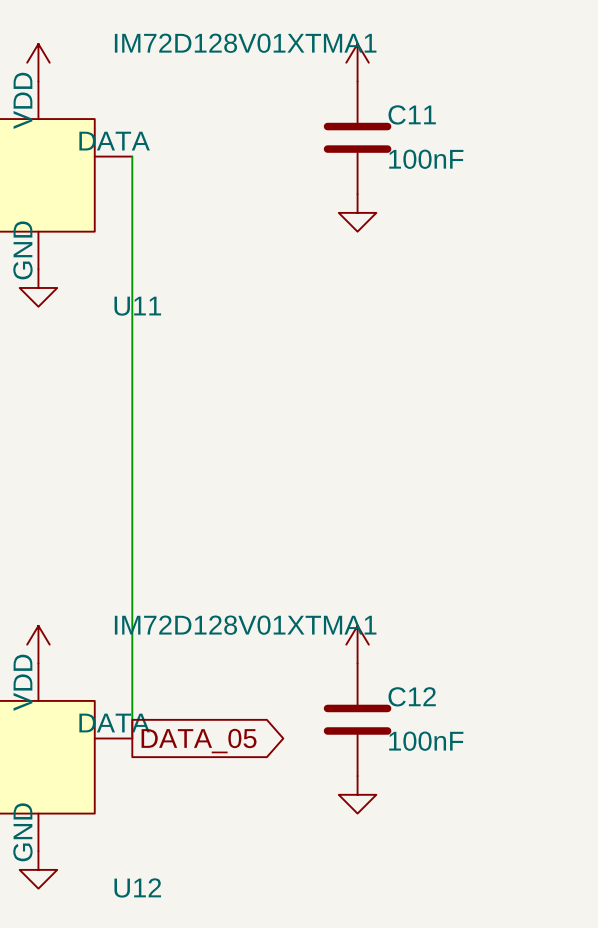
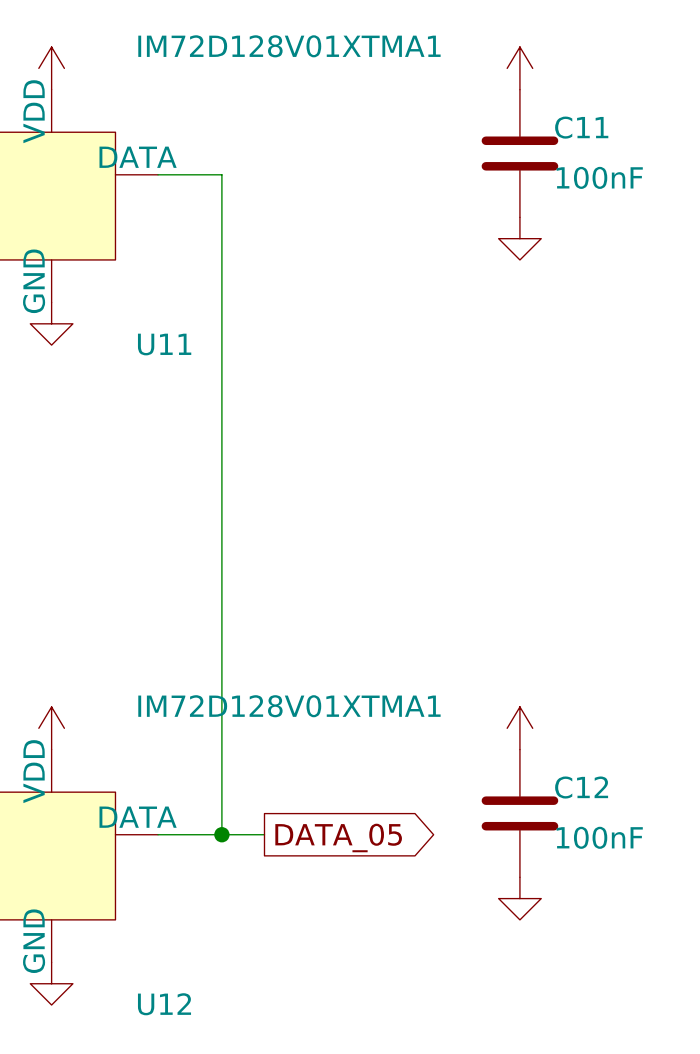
power symbol position: (357, 62) -> (519, 68)
C11 position: (357, 137) -> (519, 153)
wire: (132, 156) (132, 738) -> (158, 174) (221, 174) (221, 834)
power symbol position: (357, 212) -> (519, 238)
power symbol position: (357, 644) -> (519, 728)
C12 position: (357, 719) -> (519, 813)
wire: none -> (158, 834) (264, 834)
junction: none -> (221, 834)
global label position: DATA_05 (199, 741) -> DATA_05 (338, 837)
power symbol position: (357, 794) -> (519, 898)

